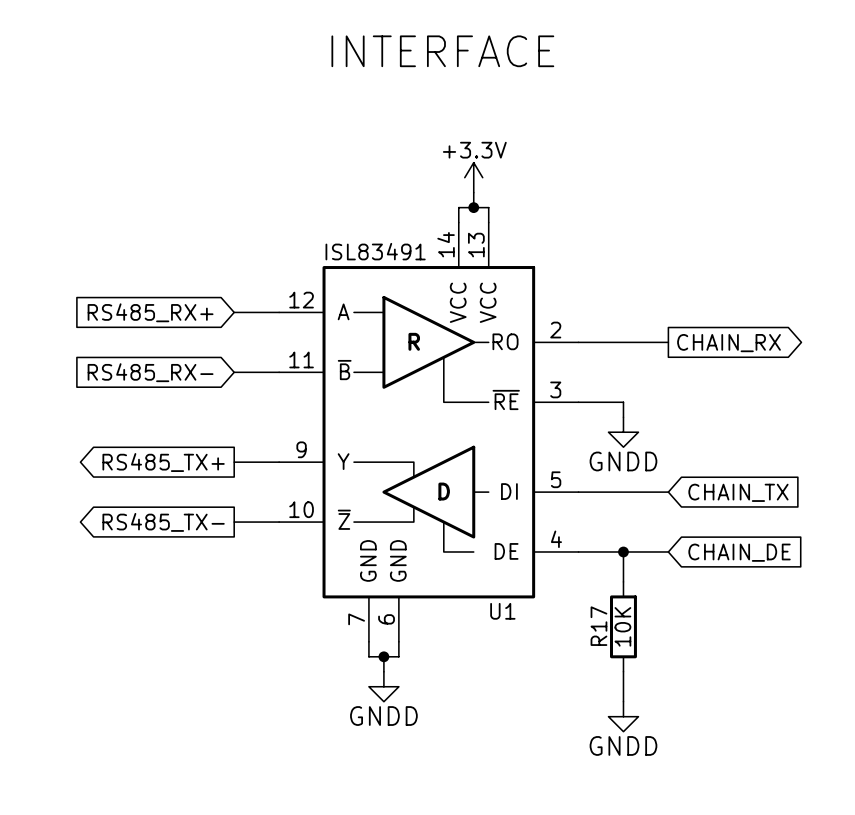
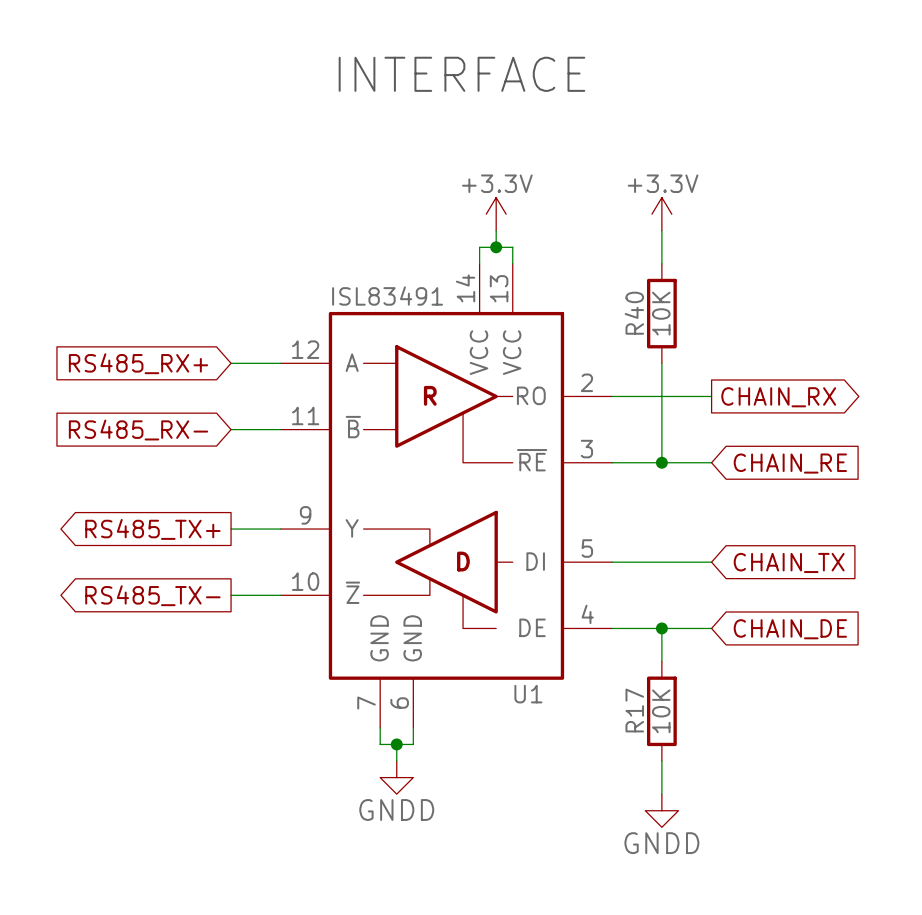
power symbol: none -> +3.3V (661, 214)
wire: none -> (661, 230) (661, 263)
R40: none -> 10K (661, 313)
wire: none -> (661, 363) (661, 462) (711, 462)
wire: (623, 402) (623, 417) -> none
junction: none -> (661, 462)
global label: none -> CHAIN_RE (790, 463)
power symbol: GNDD (623, 432) -> none

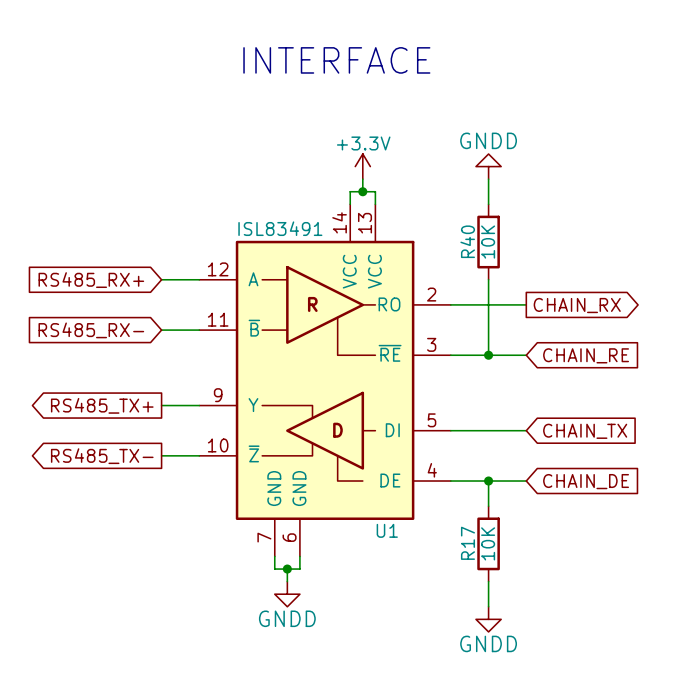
power symbol: +3.3V (661, 214) -> GNDD (488, 166)

